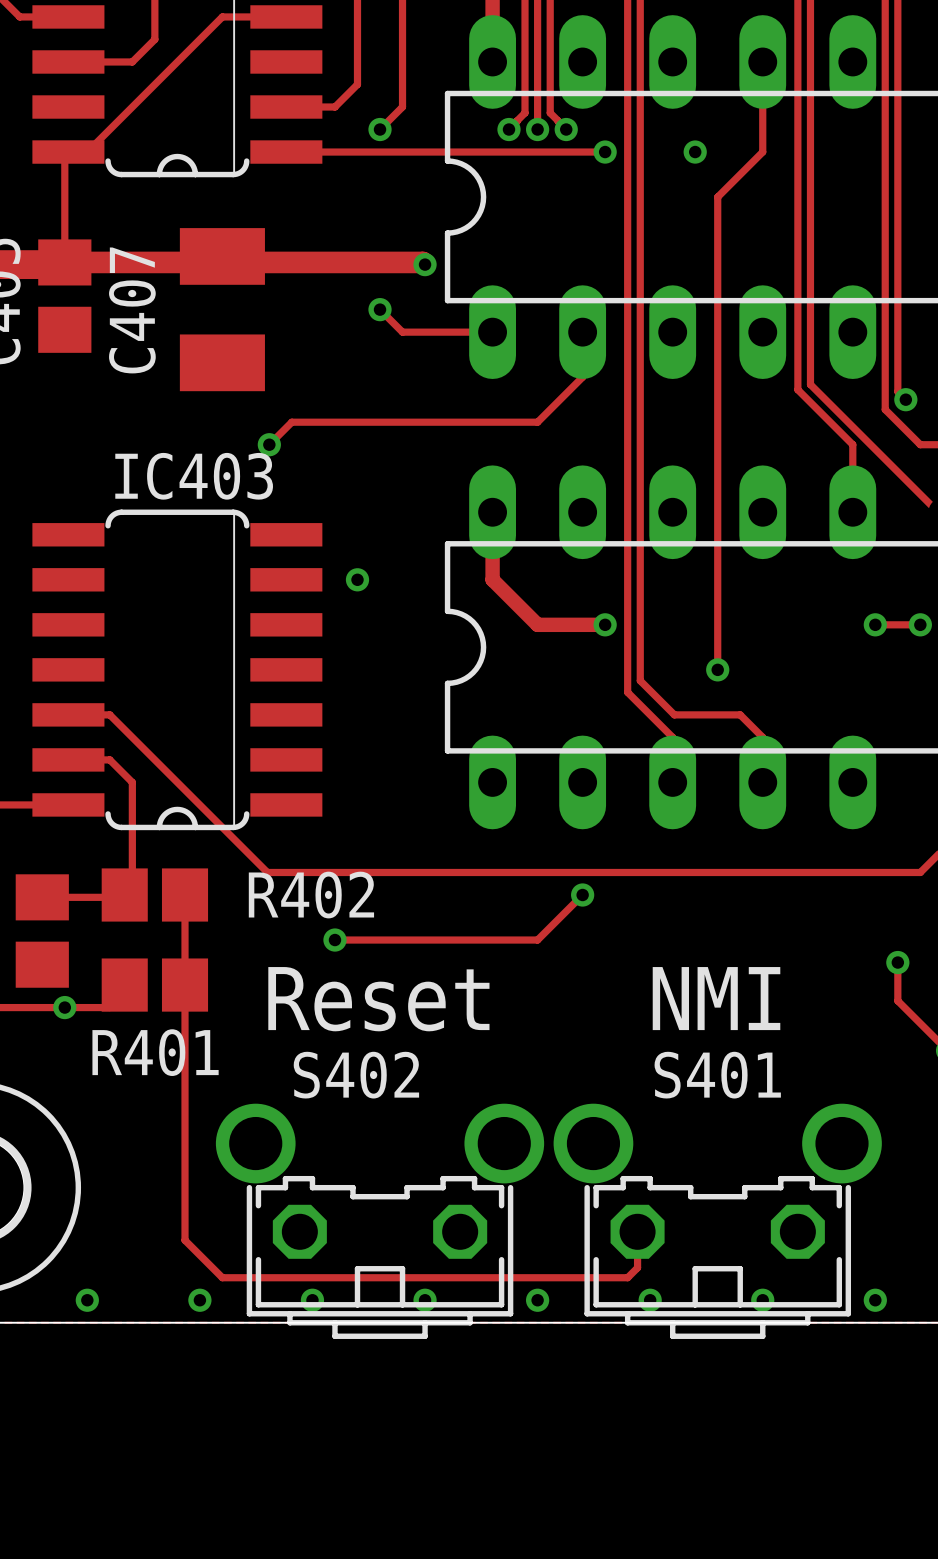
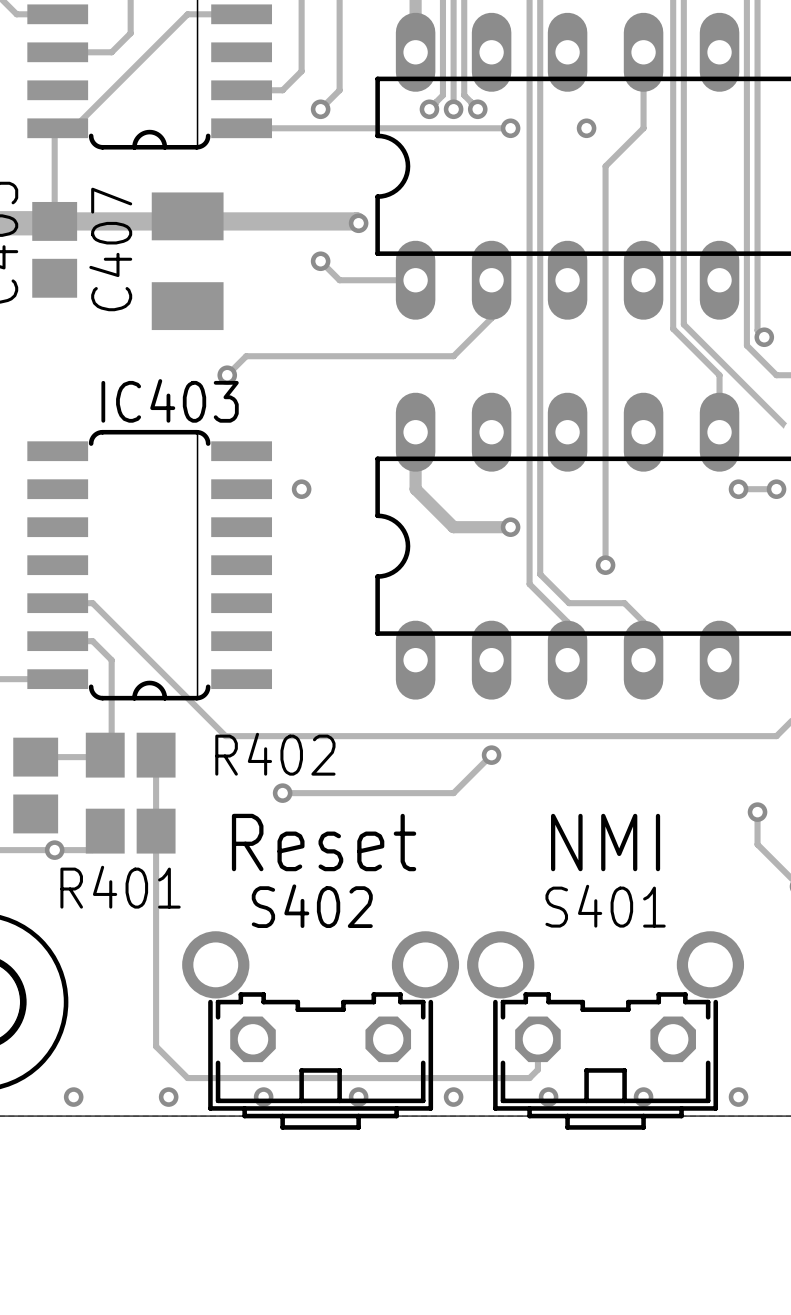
via: none -> (738, 489)
via: none -> (776, 489)
track: (875, 624) (920, 624) -> (738, 489) (776, 489)
via: (875, 624) -> none
via: (920, 624) -> none

